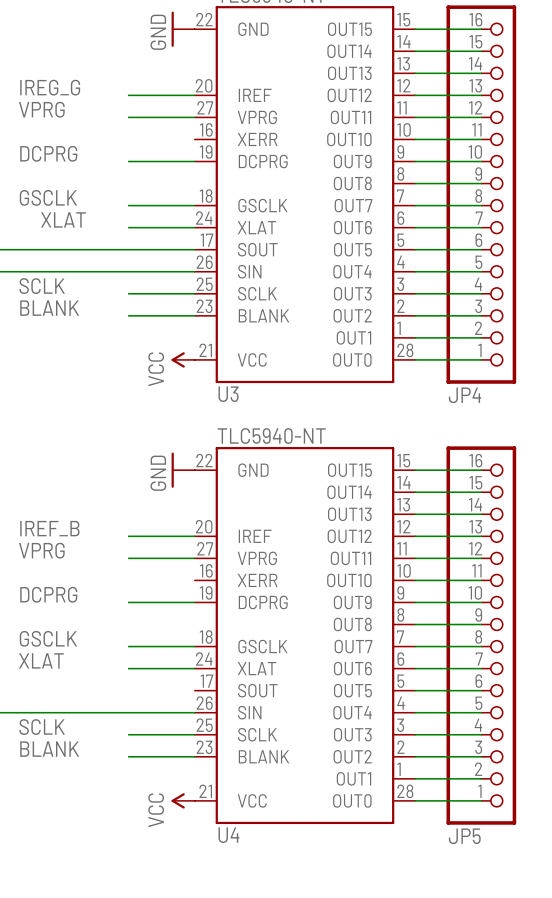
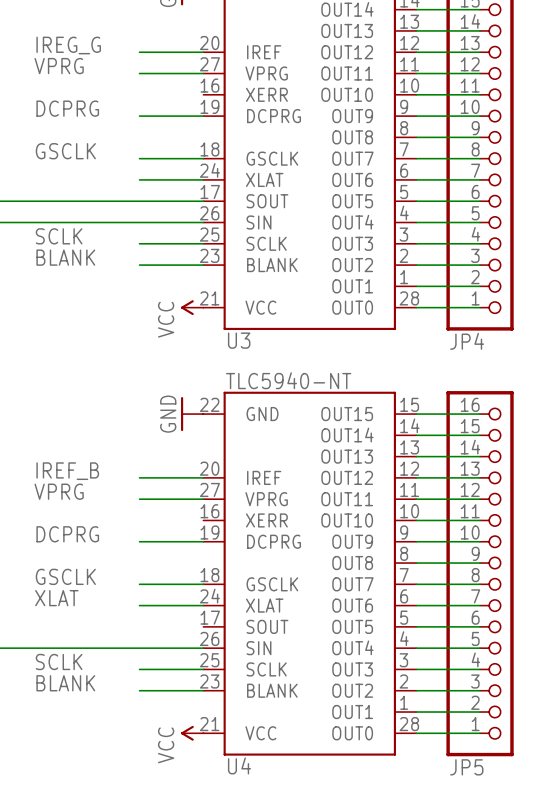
label: XLAT (63, 219) -> none

